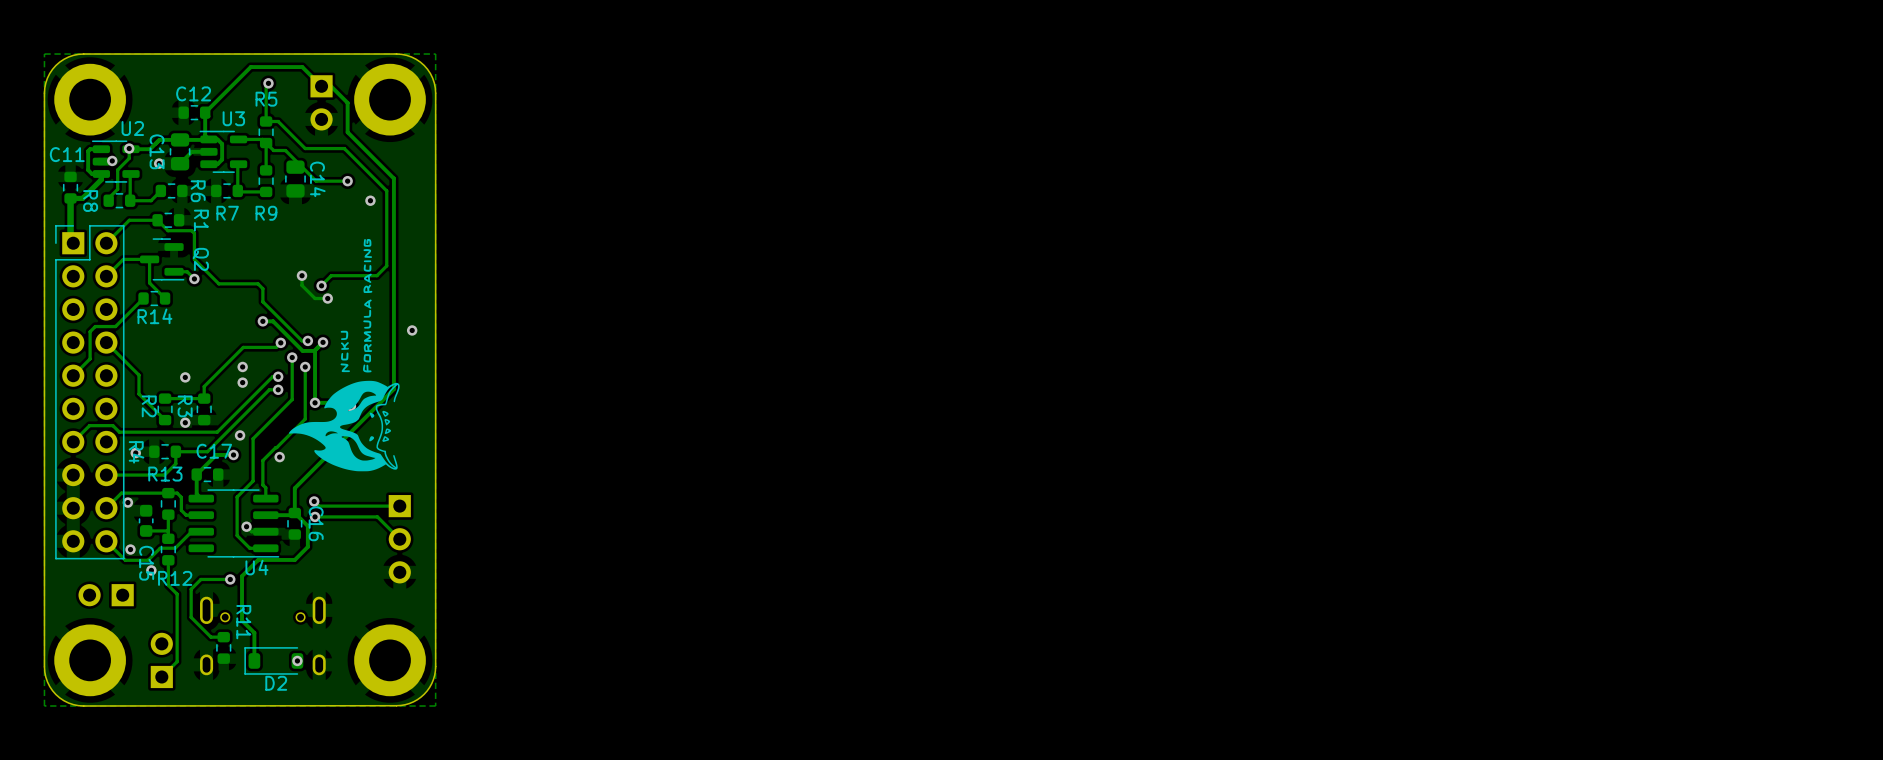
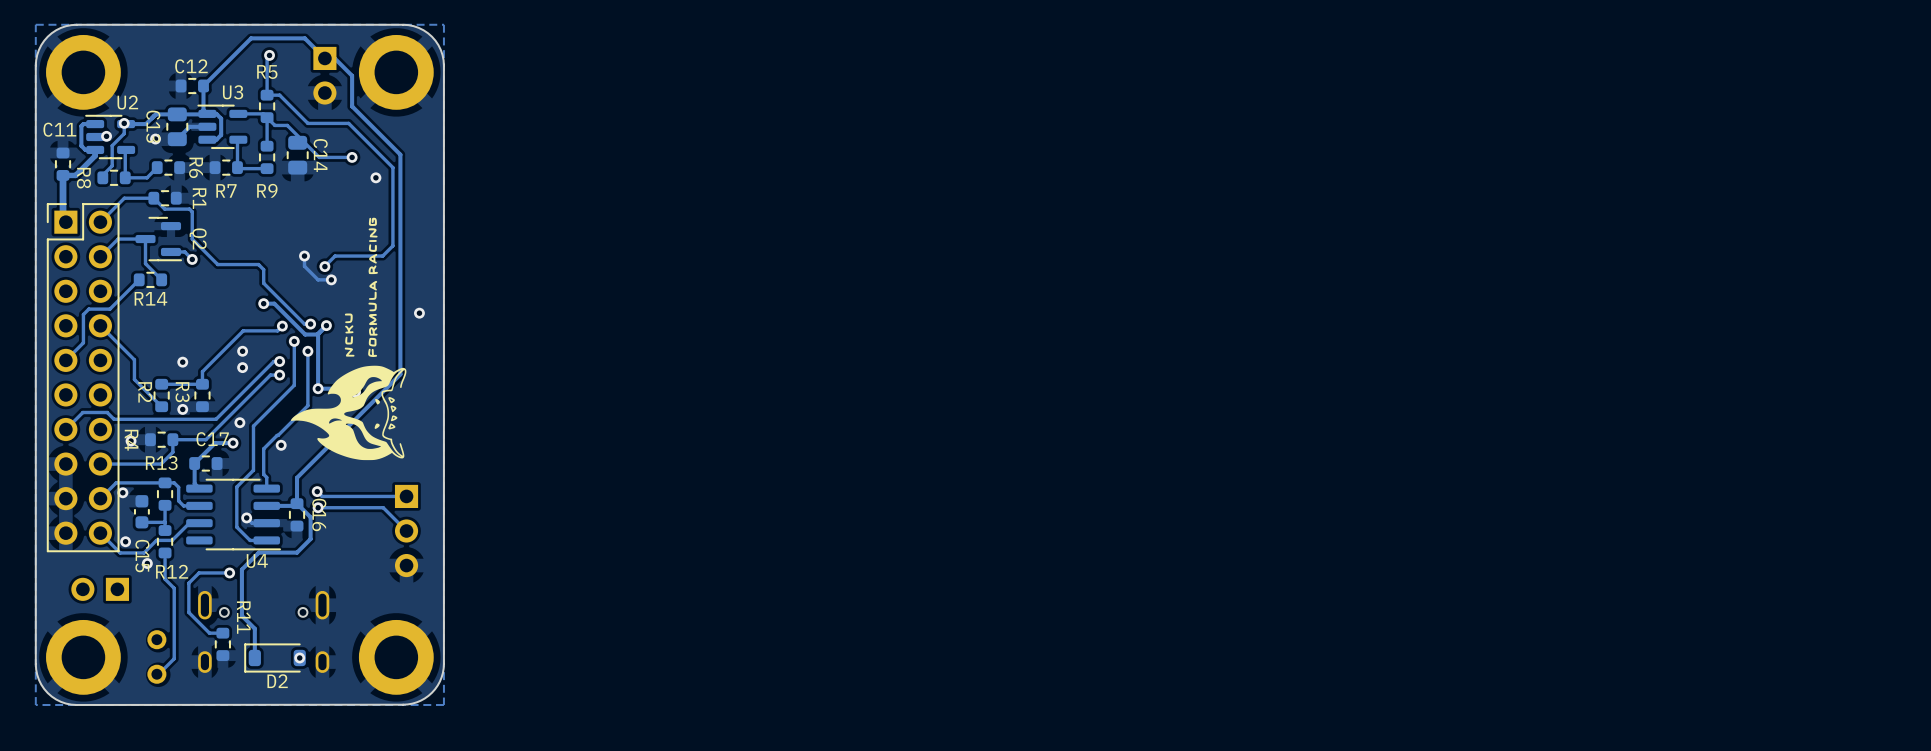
part footprint: [150, 632, 173, 689] -> [147, 630, 167, 684]

